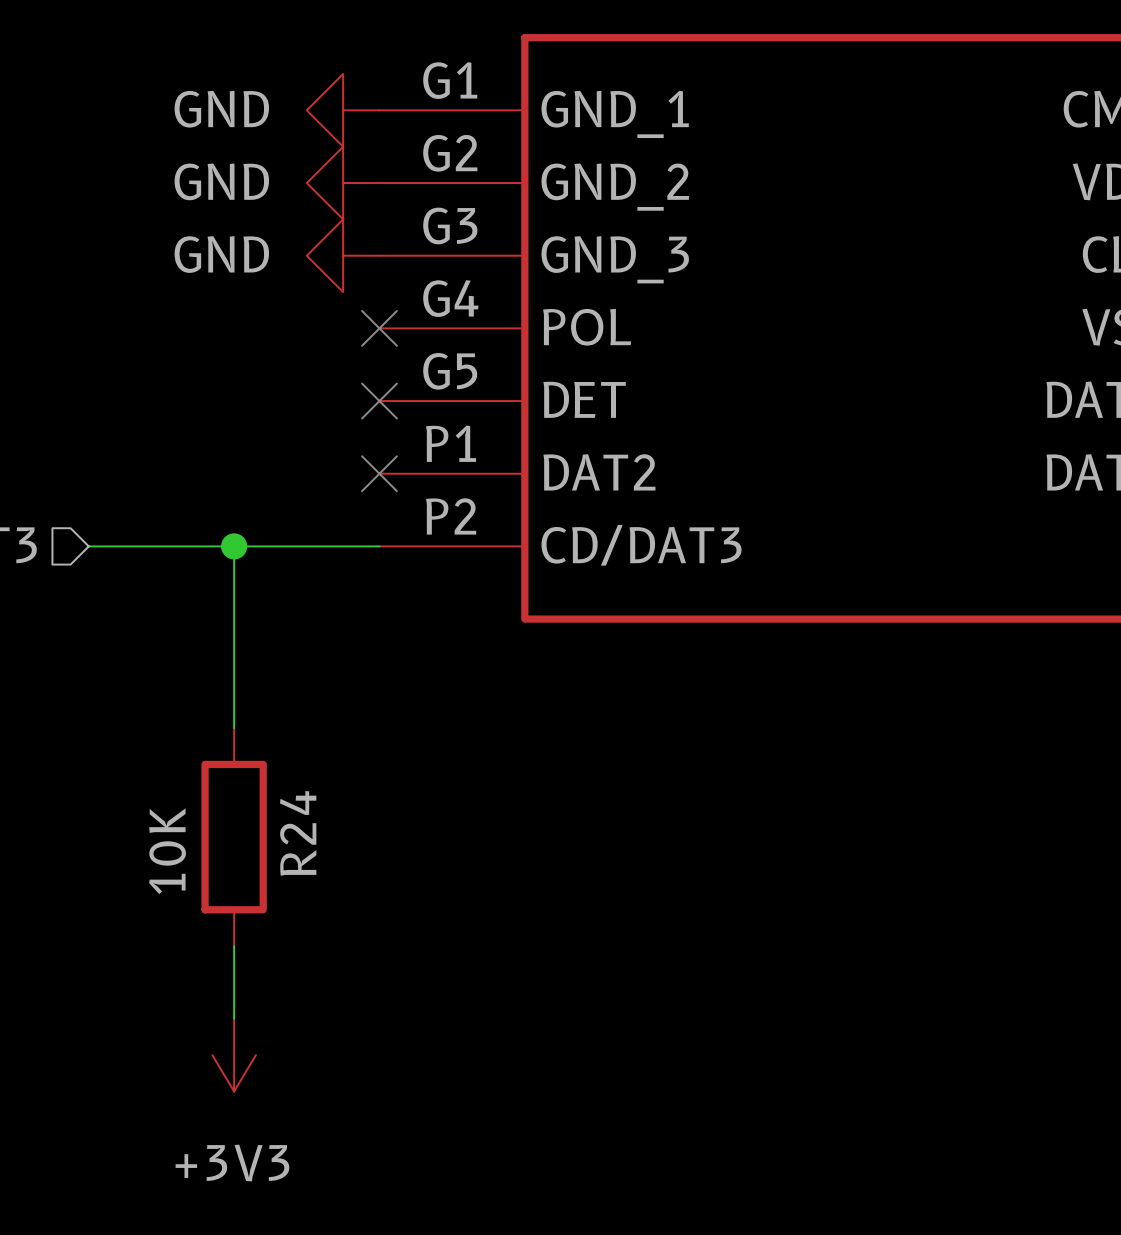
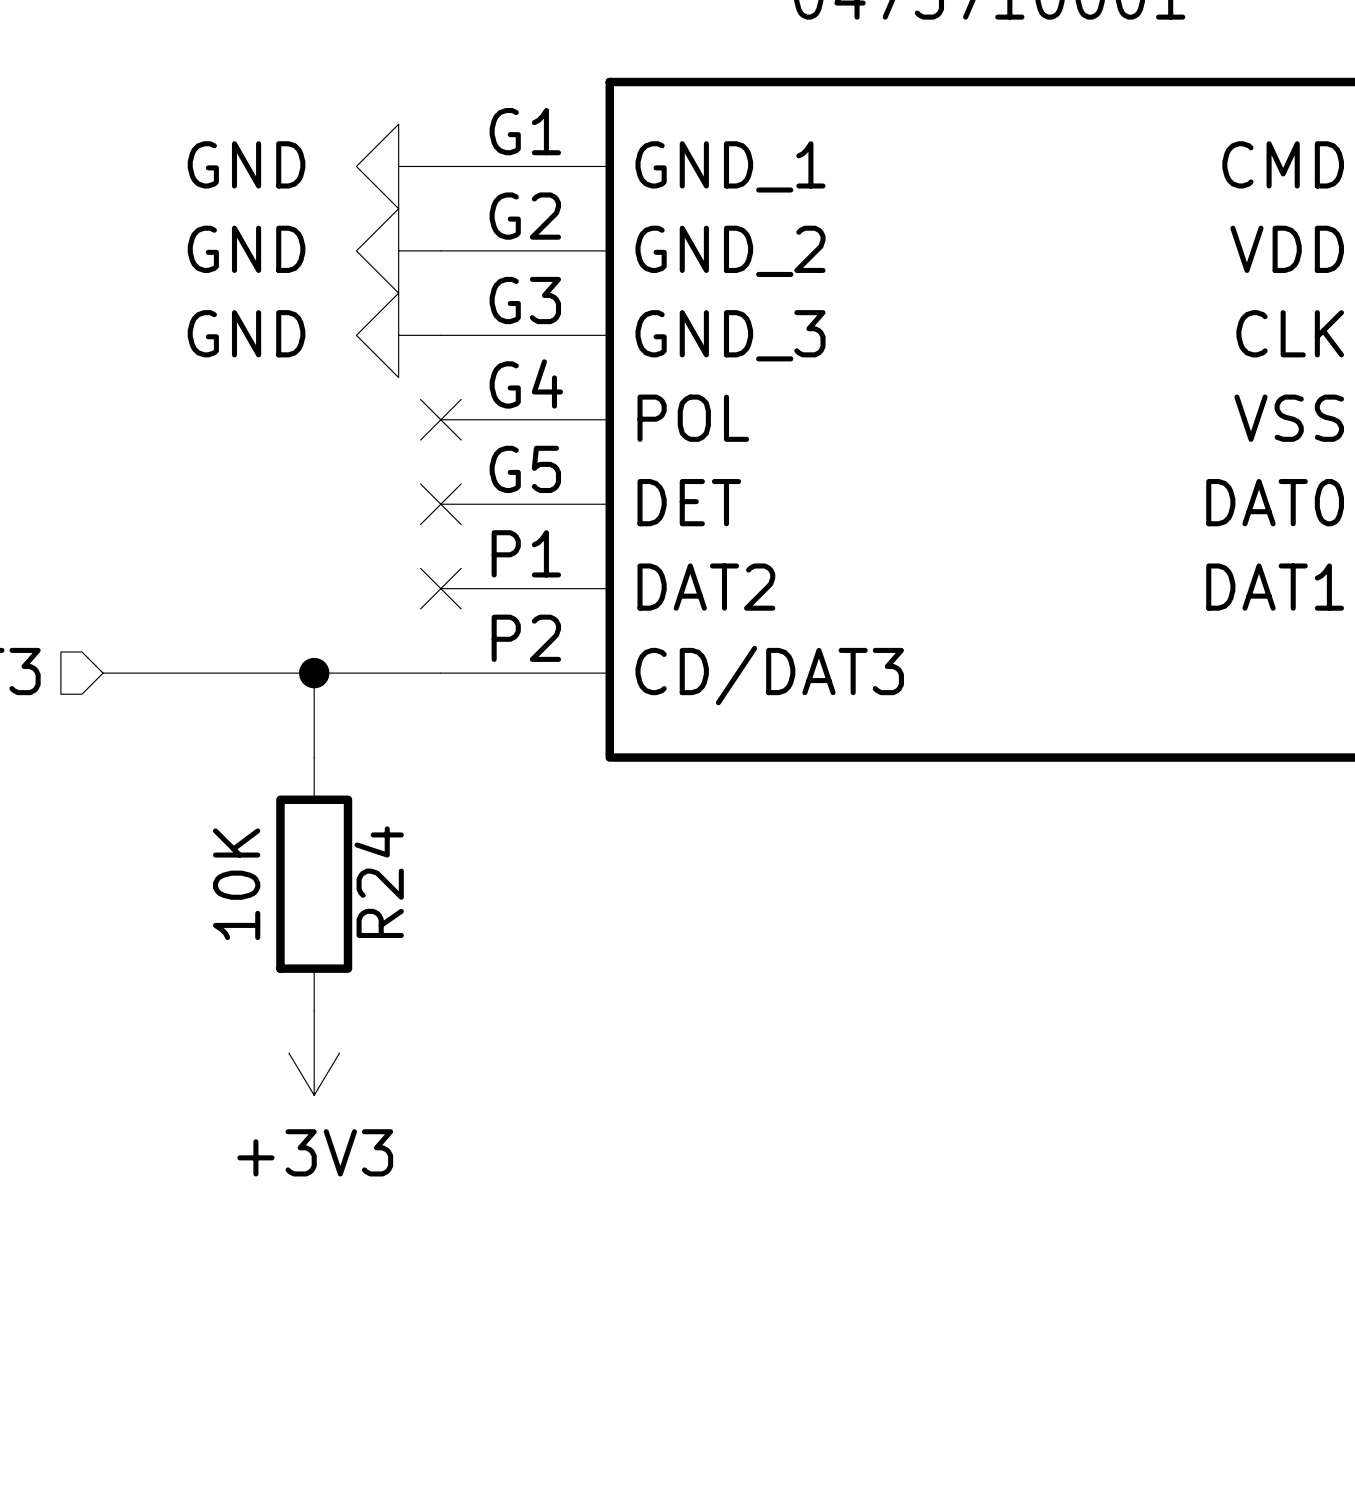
wire: (234, 546) (234, 728) -> none
junction position: (234, 546) -> (314, 673)
R24 name position: R24 (298, 833) -> R24 (379, 882)
R24 position: (234, 837) -> (314, 884)
R24 value position: 10K (167, 851) -> 10K (236, 884)
wire: (234, 946) (234, 1018) -> (314, 673) (314, 757)
power symbol position: +3V3 (234, 1055) -> +3V3 (314, 1053)
power symbol text position: +3V3 (232, 1163) -> +3V3 (315, 1152)

